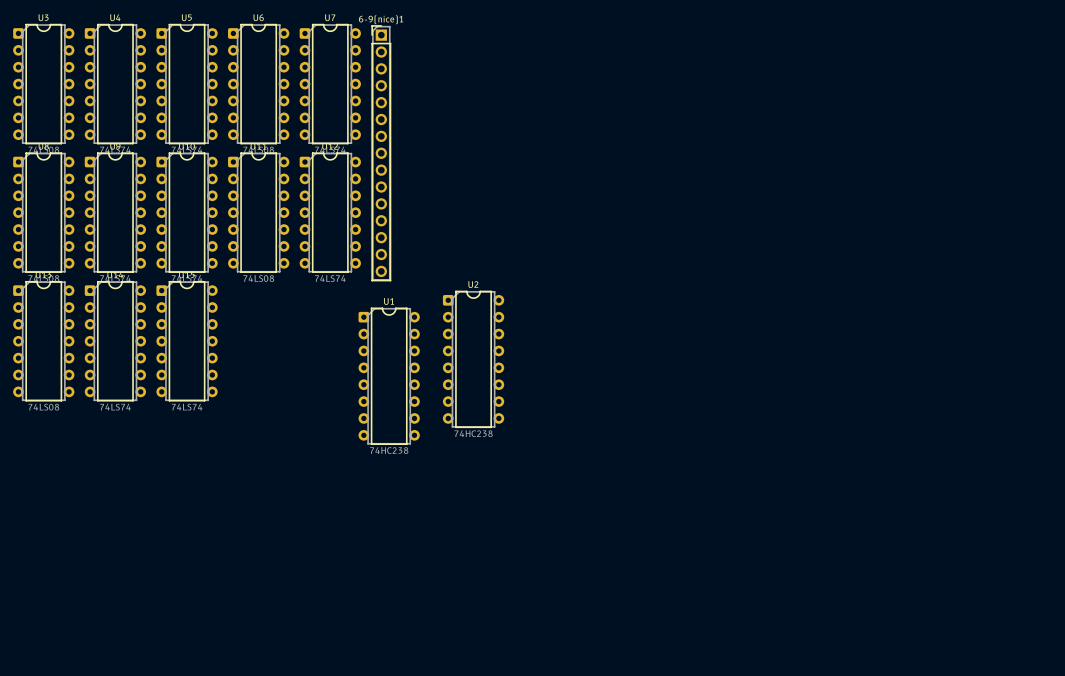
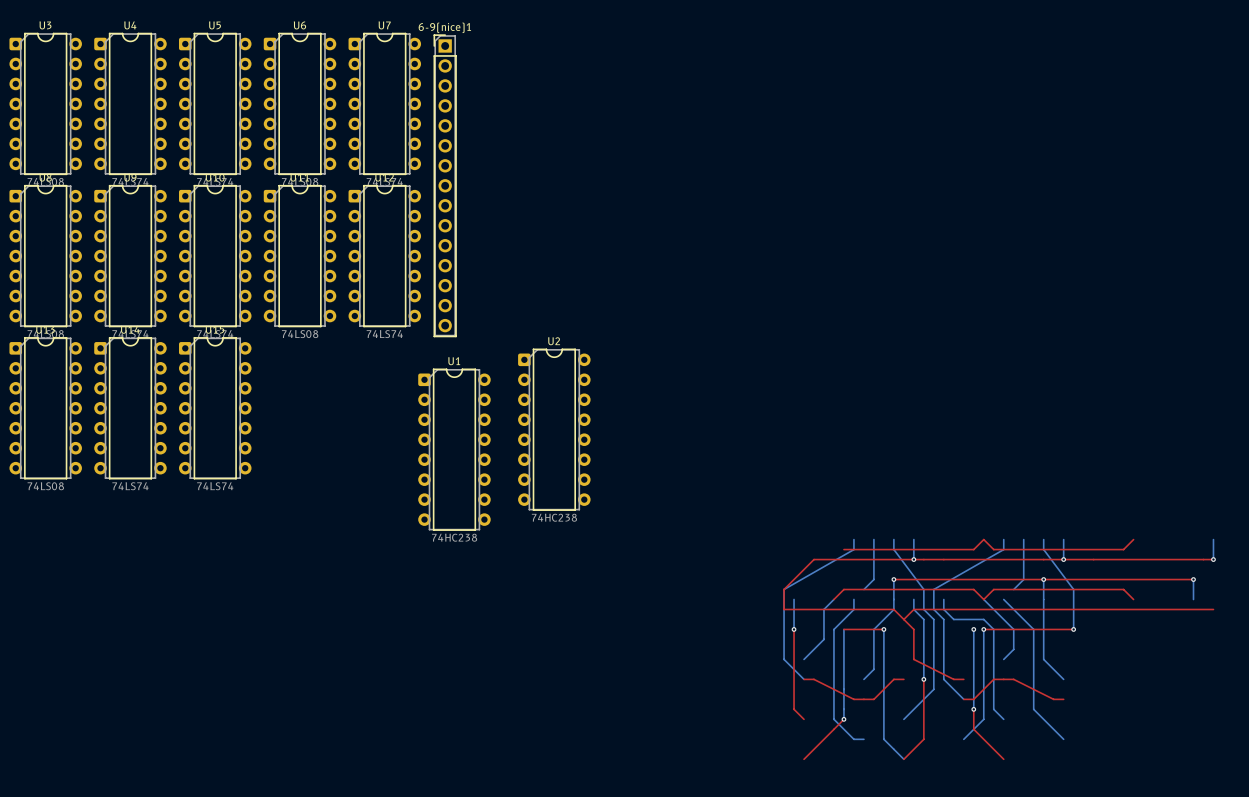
bottom track: none -> (853, 539) (853, 549) (784, 589) (784, 659) (804, 679)
bottom track: none -> (873, 539) (873, 579) (863, 589)
bottom track: none -> (893, 539) (893, 549) (923, 589) (923, 609) (933, 619) (933, 689) (903, 719)
bottom track: none -> (913, 539) (913, 559)
bottom track: none -> (1003, 539) (1003, 549) (933, 589) (933, 609) (943, 619) (943, 679) (963, 699)
bottom track: none -> (1023, 539) (1023, 579) (1013, 589)
bottom track: none -> (1043, 539) (1043, 549) (1073, 589) (1073, 629)
bottom track: none -> (1063, 539) (1063, 559)
top track: none -> (1133, 539) (1123, 549) (993, 549) (983, 539) (973, 549) (843, 549)
bottom track: none -> (1213, 539) (1213, 559)
via: none -> (913, 559)
via: none -> (1063, 559)
top track: none -> (1213, 559) (814, 559) (784, 589) (784, 609) (893, 609) (913, 629) (913, 659) (953, 679) (963, 679)
via: none -> (1213, 559)
top track: none -> (893, 579) (1193, 579)
bottom track: none -> (893, 579) (893, 609) (873, 629) (873, 669) (863, 679)
via: none -> (893, 579)
bottom track: none -> (1043, 579) (1043, 659) (1063, 679)
via: none -> (1043, 579)
bottom track: none -> (1193, 579) (1193, 599)
via: none -> (1193, 579)
bottom track: none -> (794, 599) (794, 629)
top track: none -> (833, 599) (843, 589) (973, 589) (983, 599) (993, 589) (1123, 589) (1133, 599)
bottom track: none -> (833, 599) (823, 609) (823, 639) (804, 659)
bottom track: none -> (853, 599) (853, 609) (833, 629) (833, 719) (853, 739) (863, 739)
bottom track: none -> (913, 599) (913, 609) (923, 619) (923, 679)
bottom track: none -> (943, 599) (943, 609) (953, 619) (983, 619) (993, 629) (993, 709) (1003, 719)
bottom track: none -> (983, 599) (1013, 629) (1013, 649) (1003, 659)
bottom track: none -> (1003, 599) (1033, 629) (1033, 709) (1063, 739)
top track: none -> (1213, 609) (913, 609) (903, 619)
top track: none -> (794, 629) (794, 709) (804, 719)
via: none -> (794, 629)
top track: none -> (843, 629) (883, 629)
bottom track: none -> (843, 629) (843, 719)
bottom track: none -> (883, 629) (883, 739) (903, 759)
via: none -> (883, 629)
bottom track: none -> (973, 629) (973, 709)
via: none -> (973, 629)
top track: none -> (983, 629) (1073, 629)
bottom track: none -> (983, 629) (983, 719) (963, 739)
via: none -> (983, 629)
via: none -> (1073, 629)
top track: none -> (804, 679) (814, 679) (853, 699) (873, 699) (893, 679) (903, 679)
top track: none -> (923, 679) (923, 739) (903, 759)
via: none -> (923, 679)
top track: none -> (963, 699) (973, 699) (993, 679) (1013, 679) (1053, 699) (1063, 699)
top track: none -> (973, 709) (973, 729) (1003, 759)
via: none -> (973, 709)
top track: none -> (843, 719) (804, 759)
via: none -> (843, 719)

